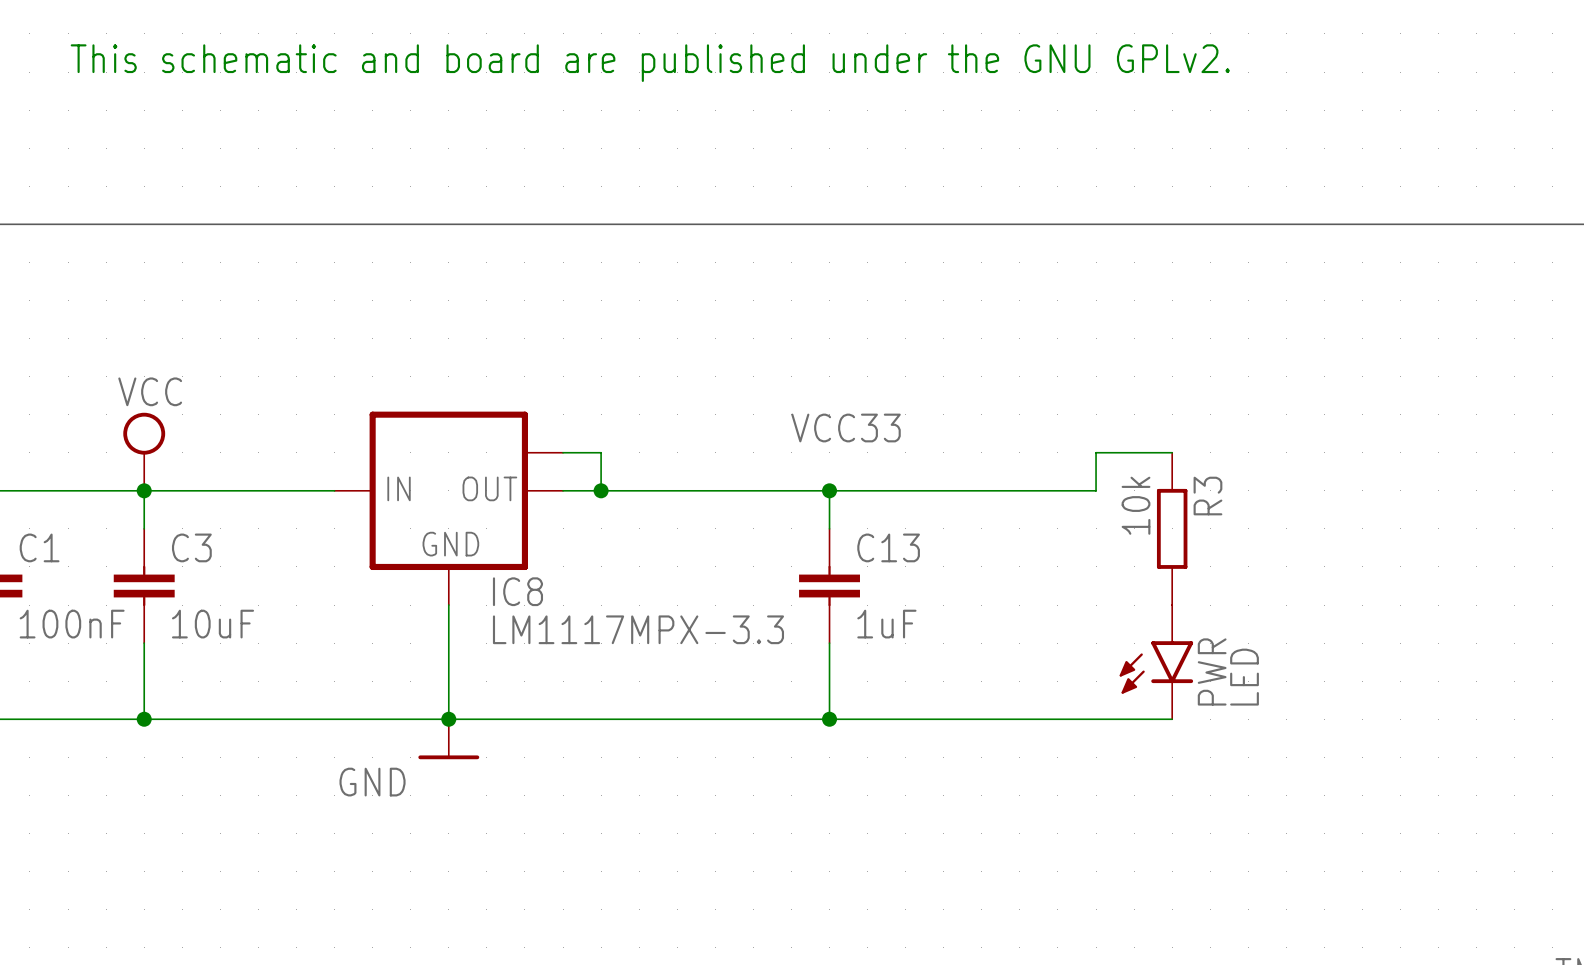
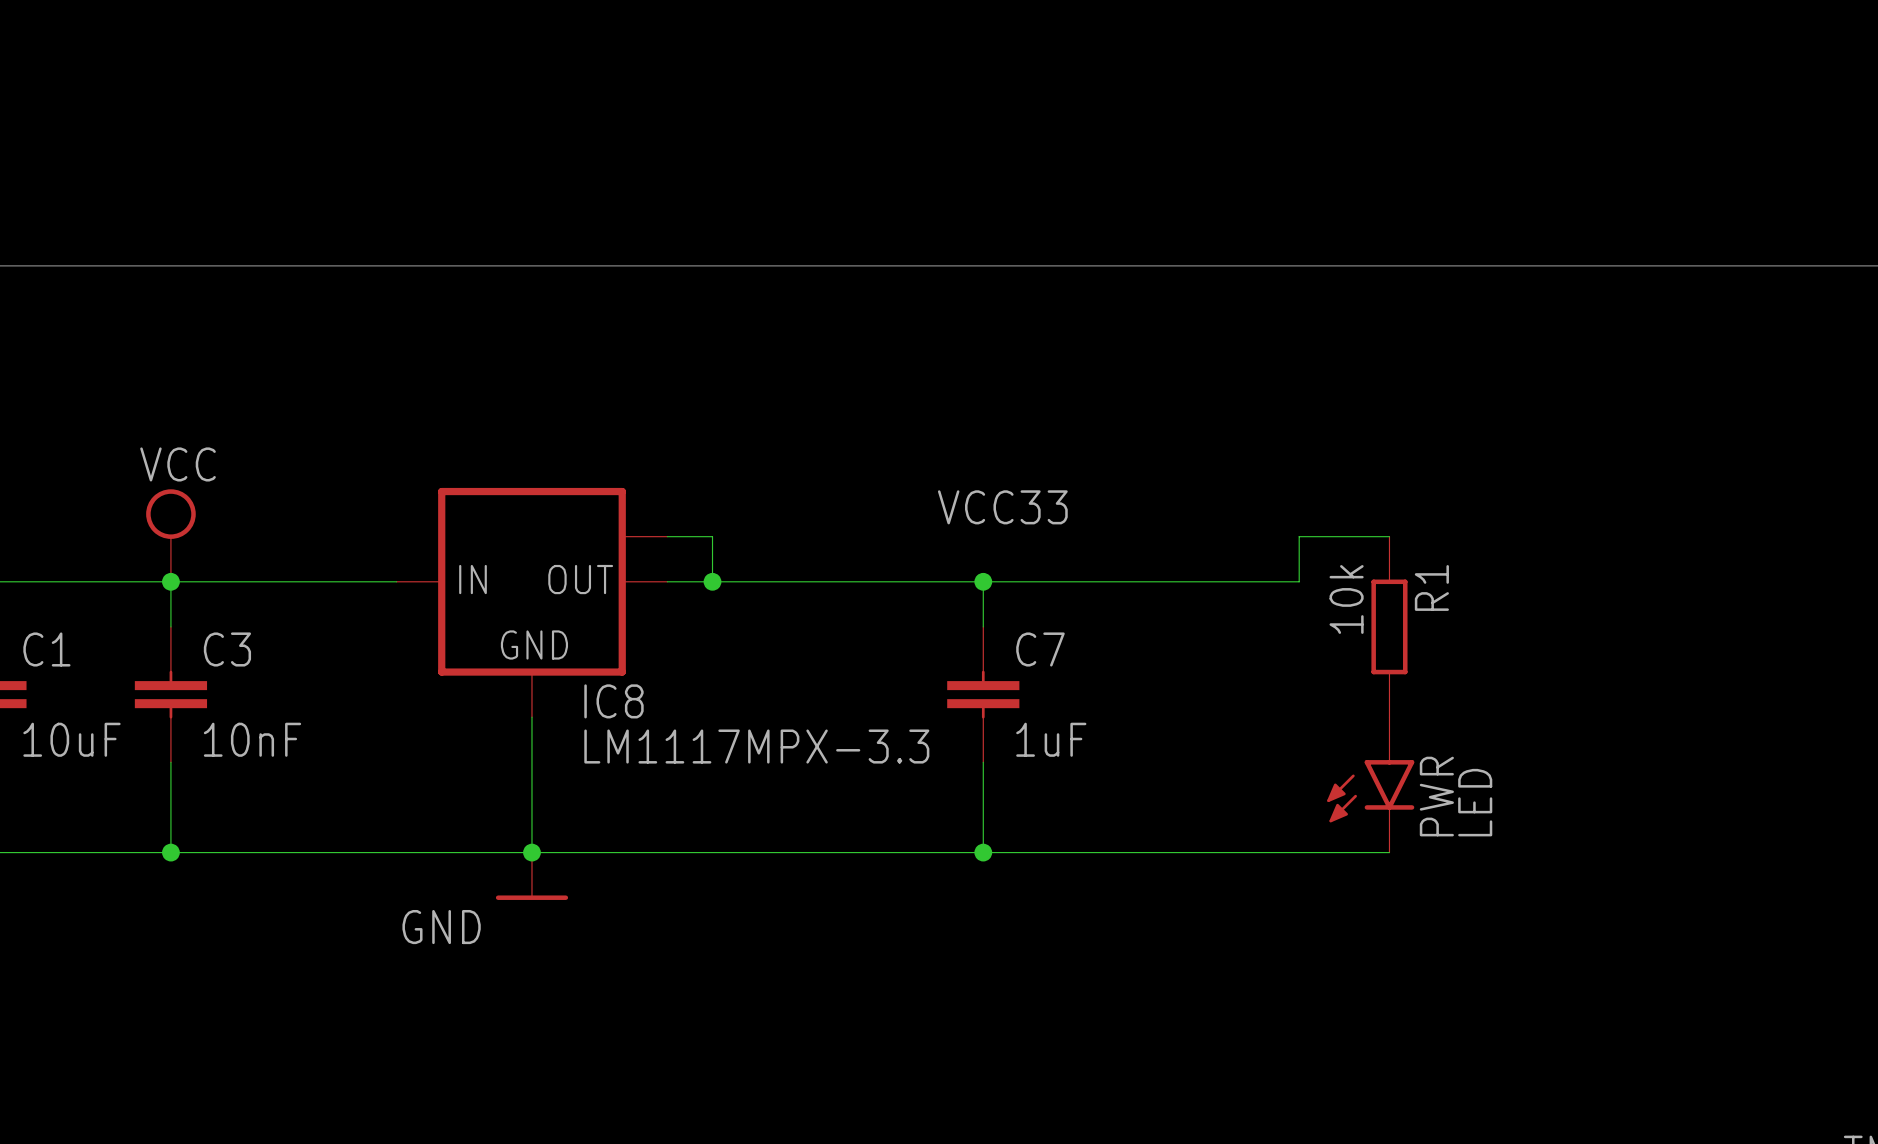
text: This schematic and board are published under the GNU GPLv2. (650, 63) -> none
R3 name: R3 (1207, 496) -> R1 (1431, 587)
C13 name: C13 (888, 547) -> C7 (1040, 649)
C1 value: 100nF (72, 624) -> 10uF (71, 739)
C3 value: 10uF (213, 624) -> 10nF (252, 739)

